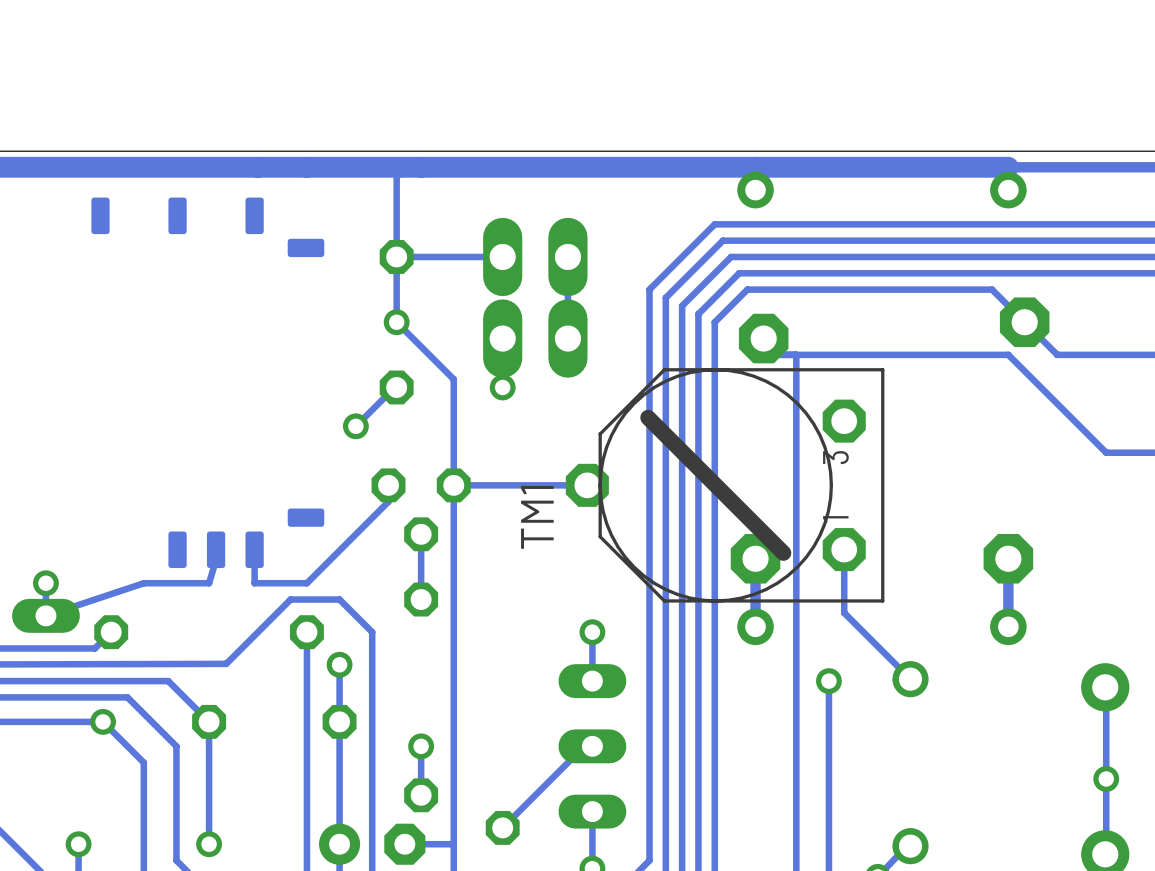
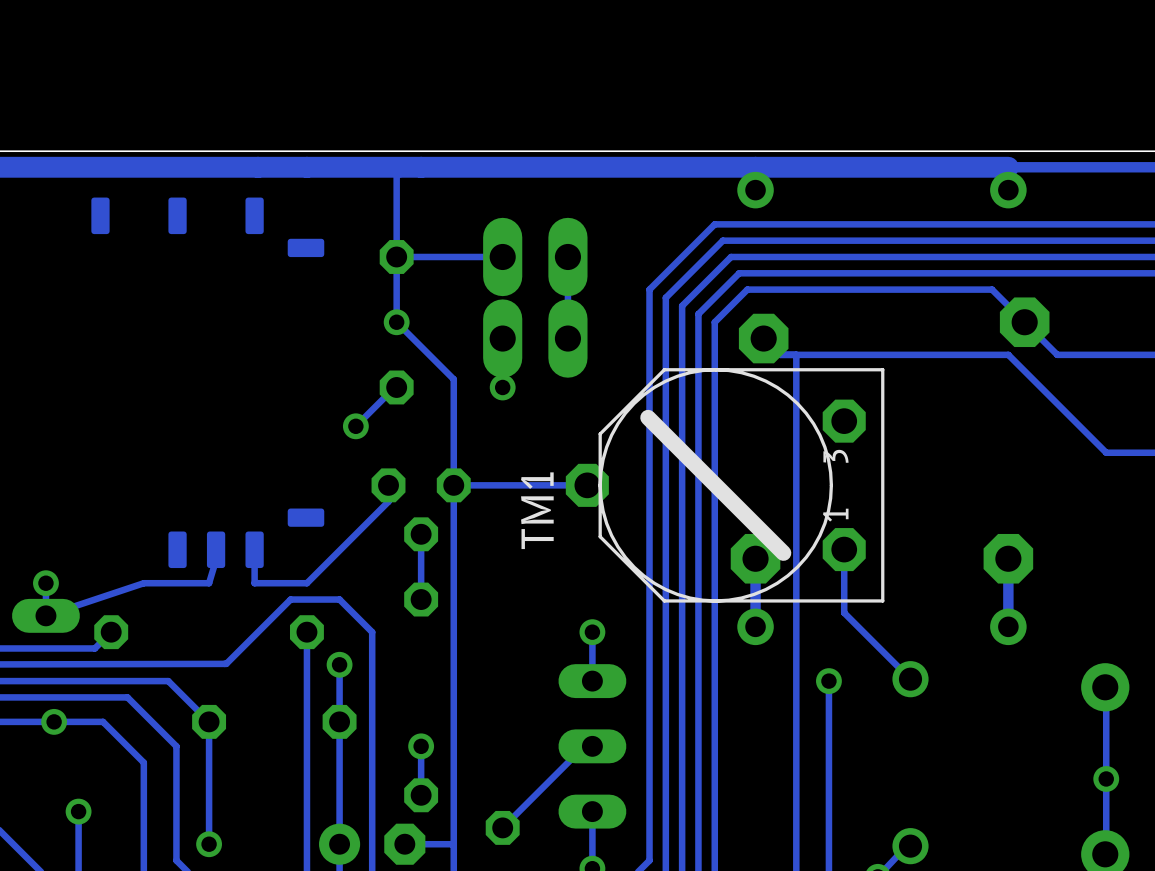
via: none -> (54, 721)
via: (103, 721) -> none
track: none -> (78, 811) (78, 844)
via position: (78, 844) -> (78, 811)

